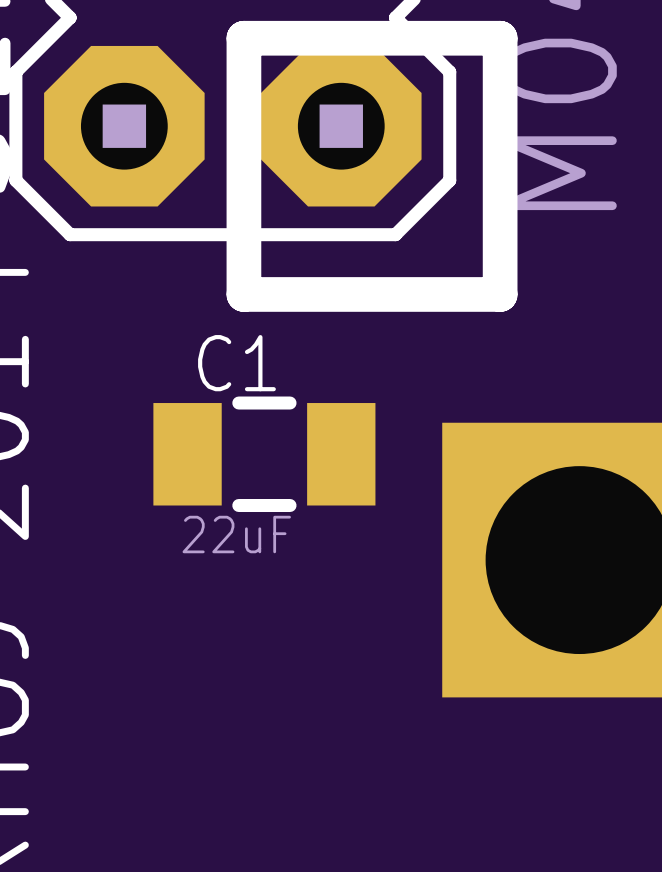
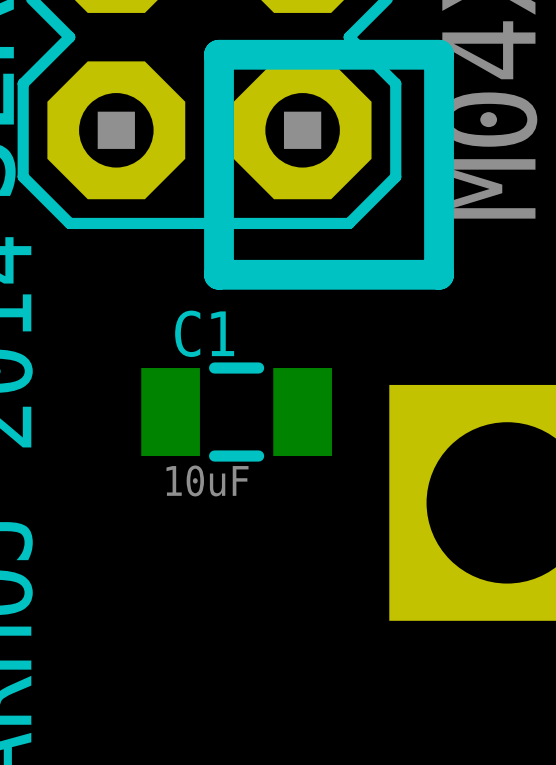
C1 value: 22uF (236, 534) -> 10uF (207, 480)

